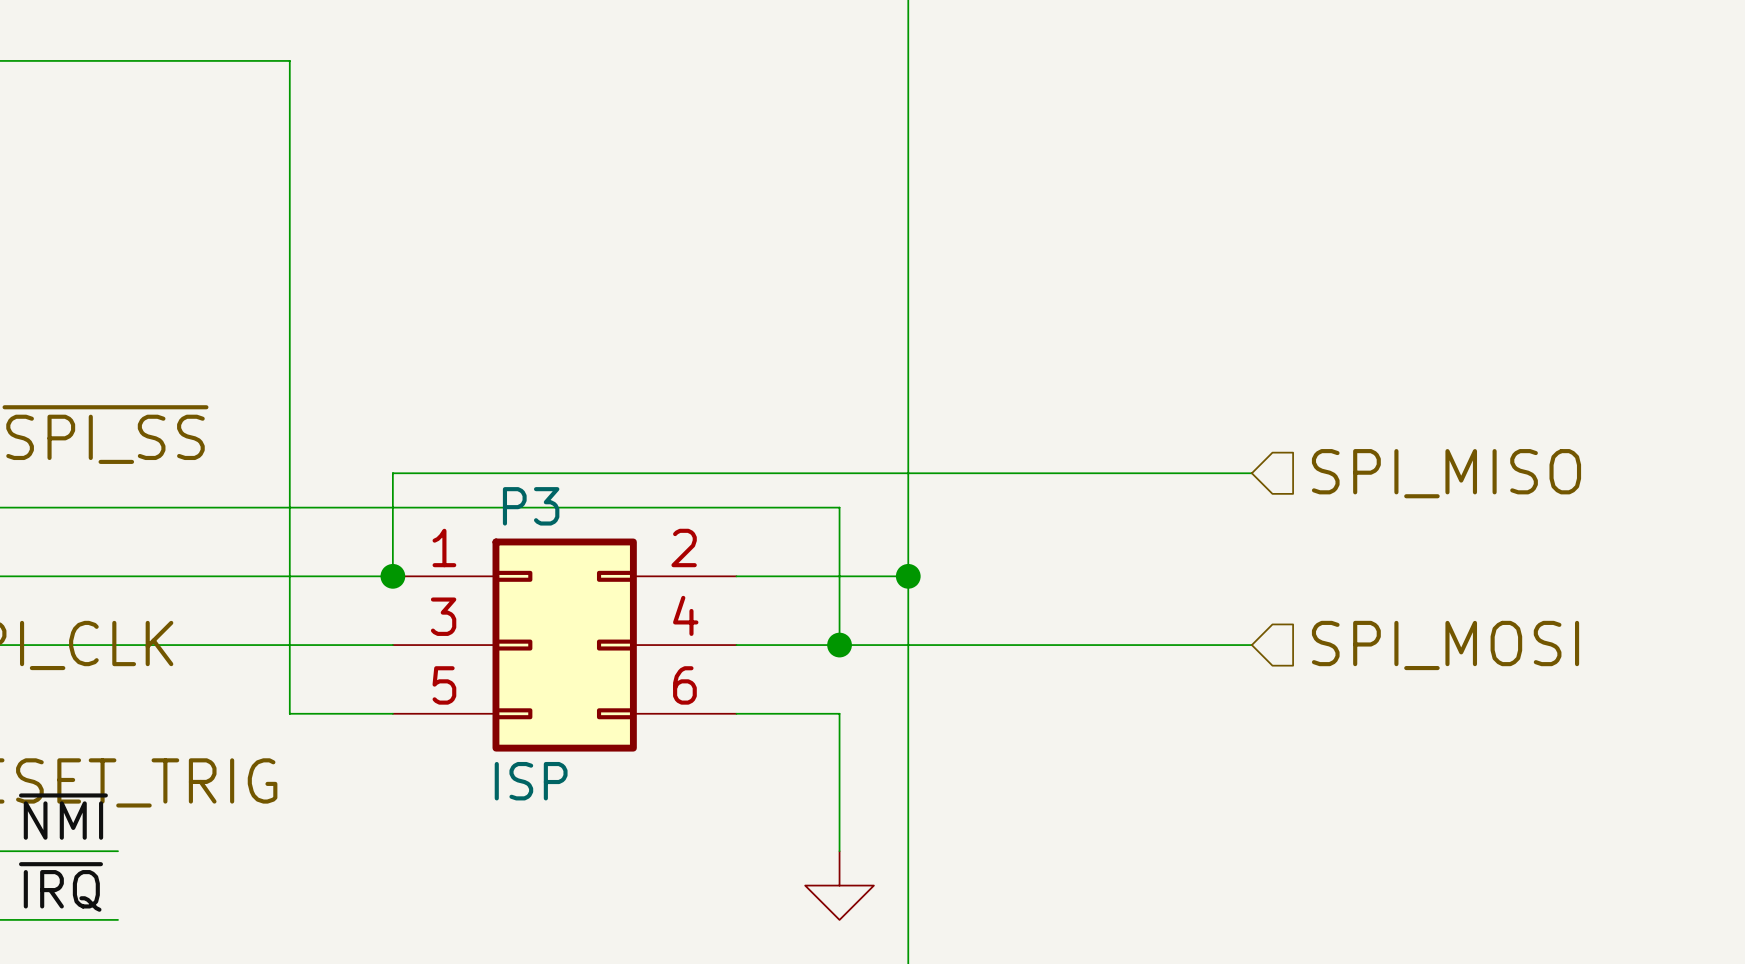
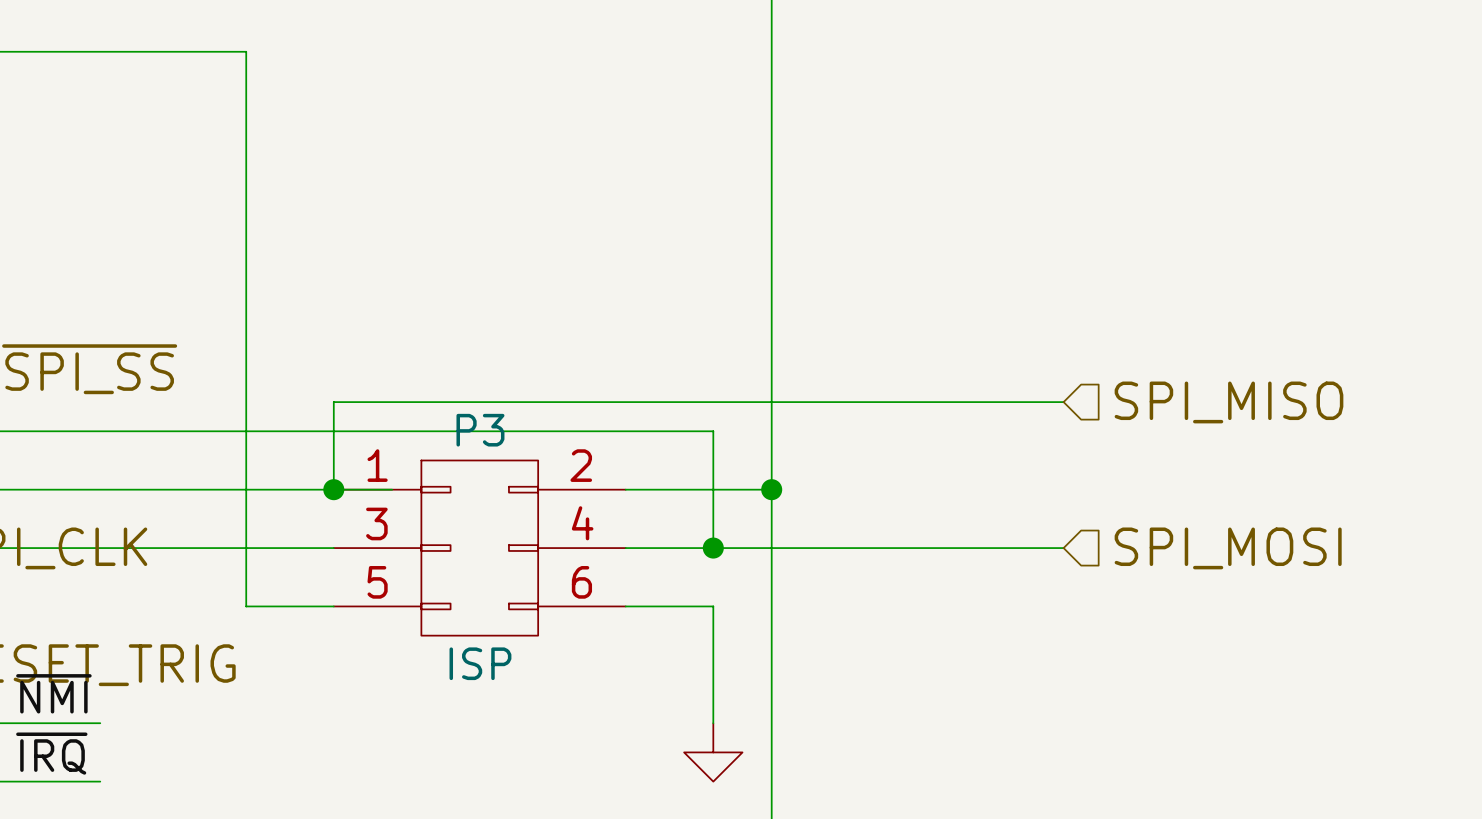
P3 symbol: [392, 538, 737, 752] -> [333, 460, 626, 636]

